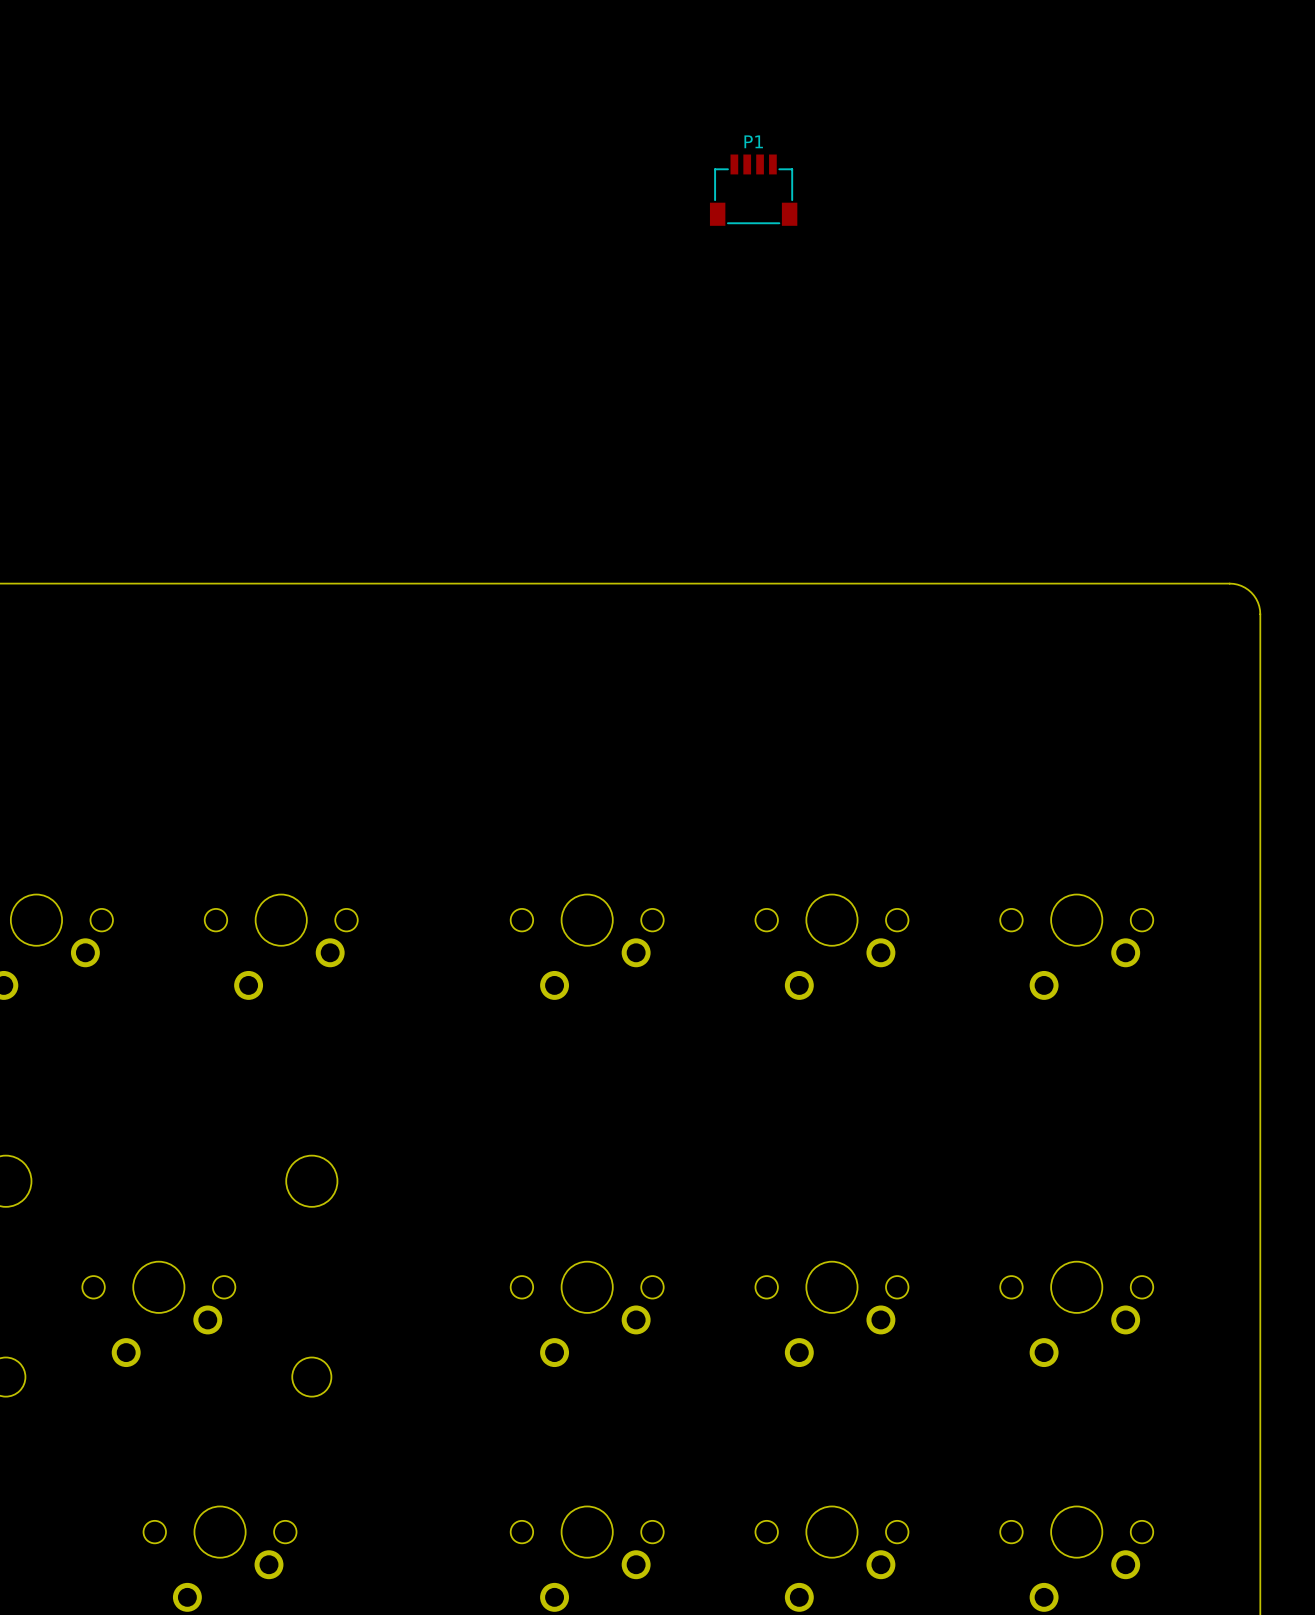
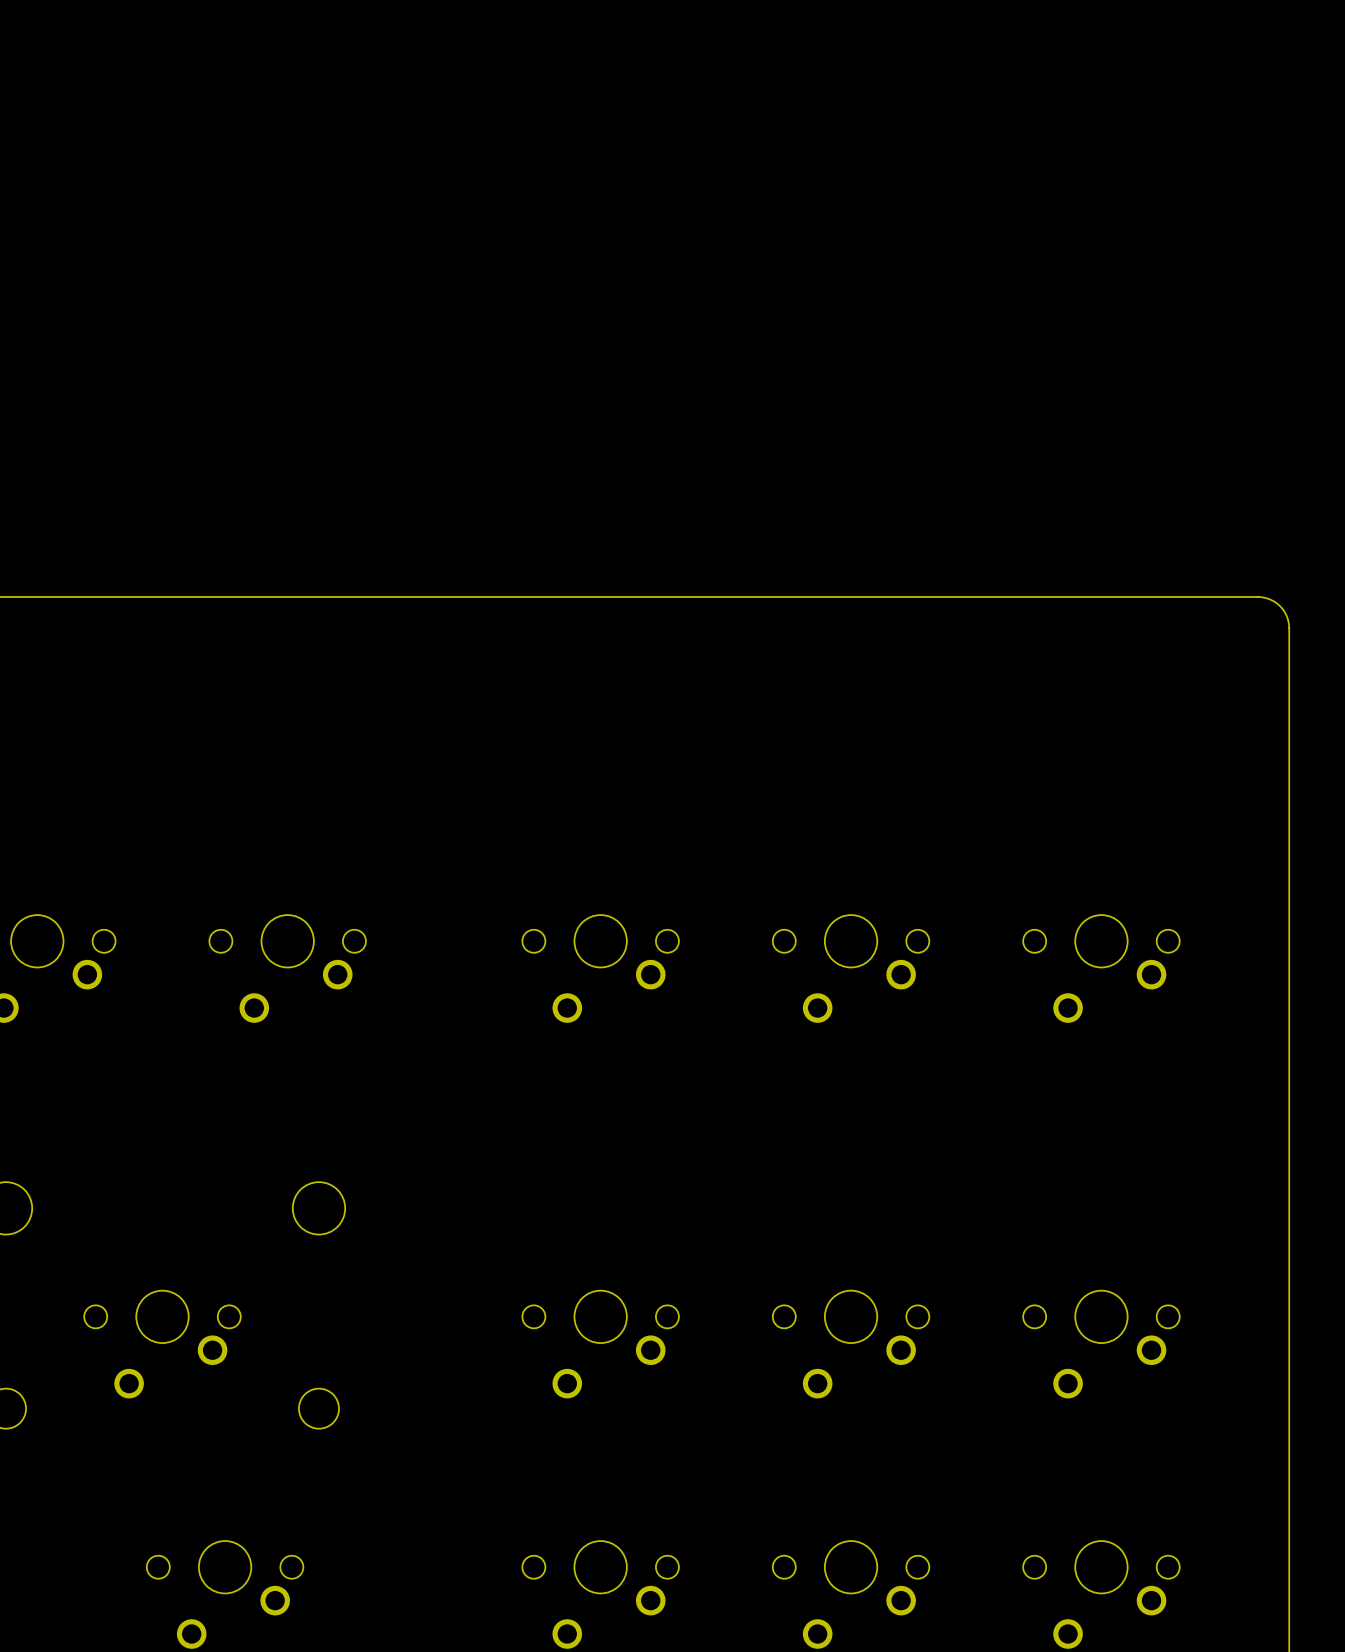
P1: (753, 190) -> none

